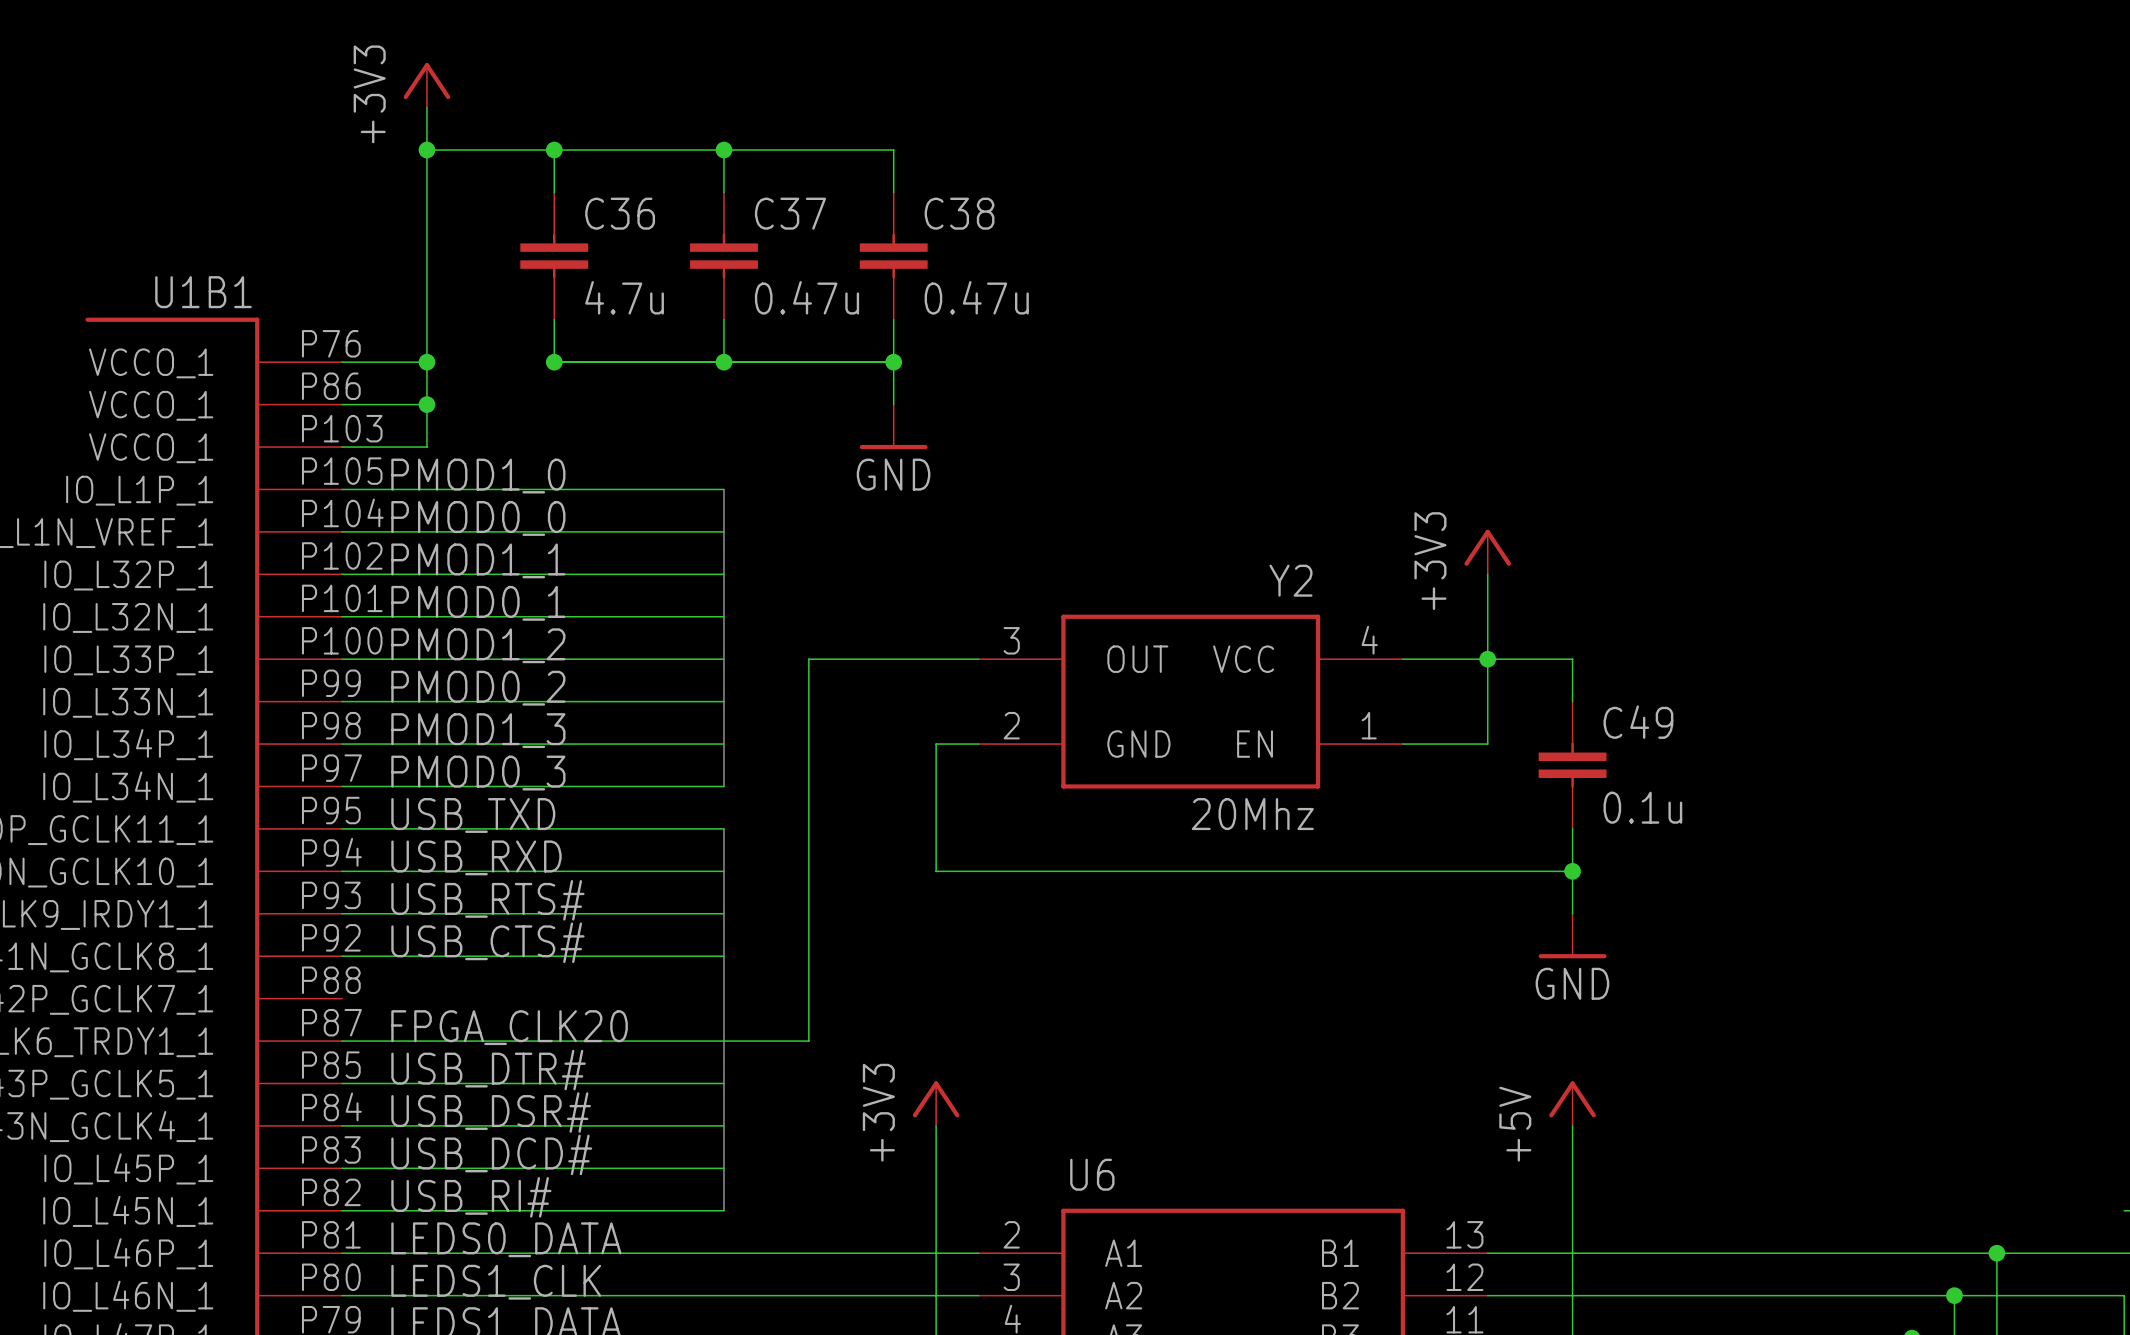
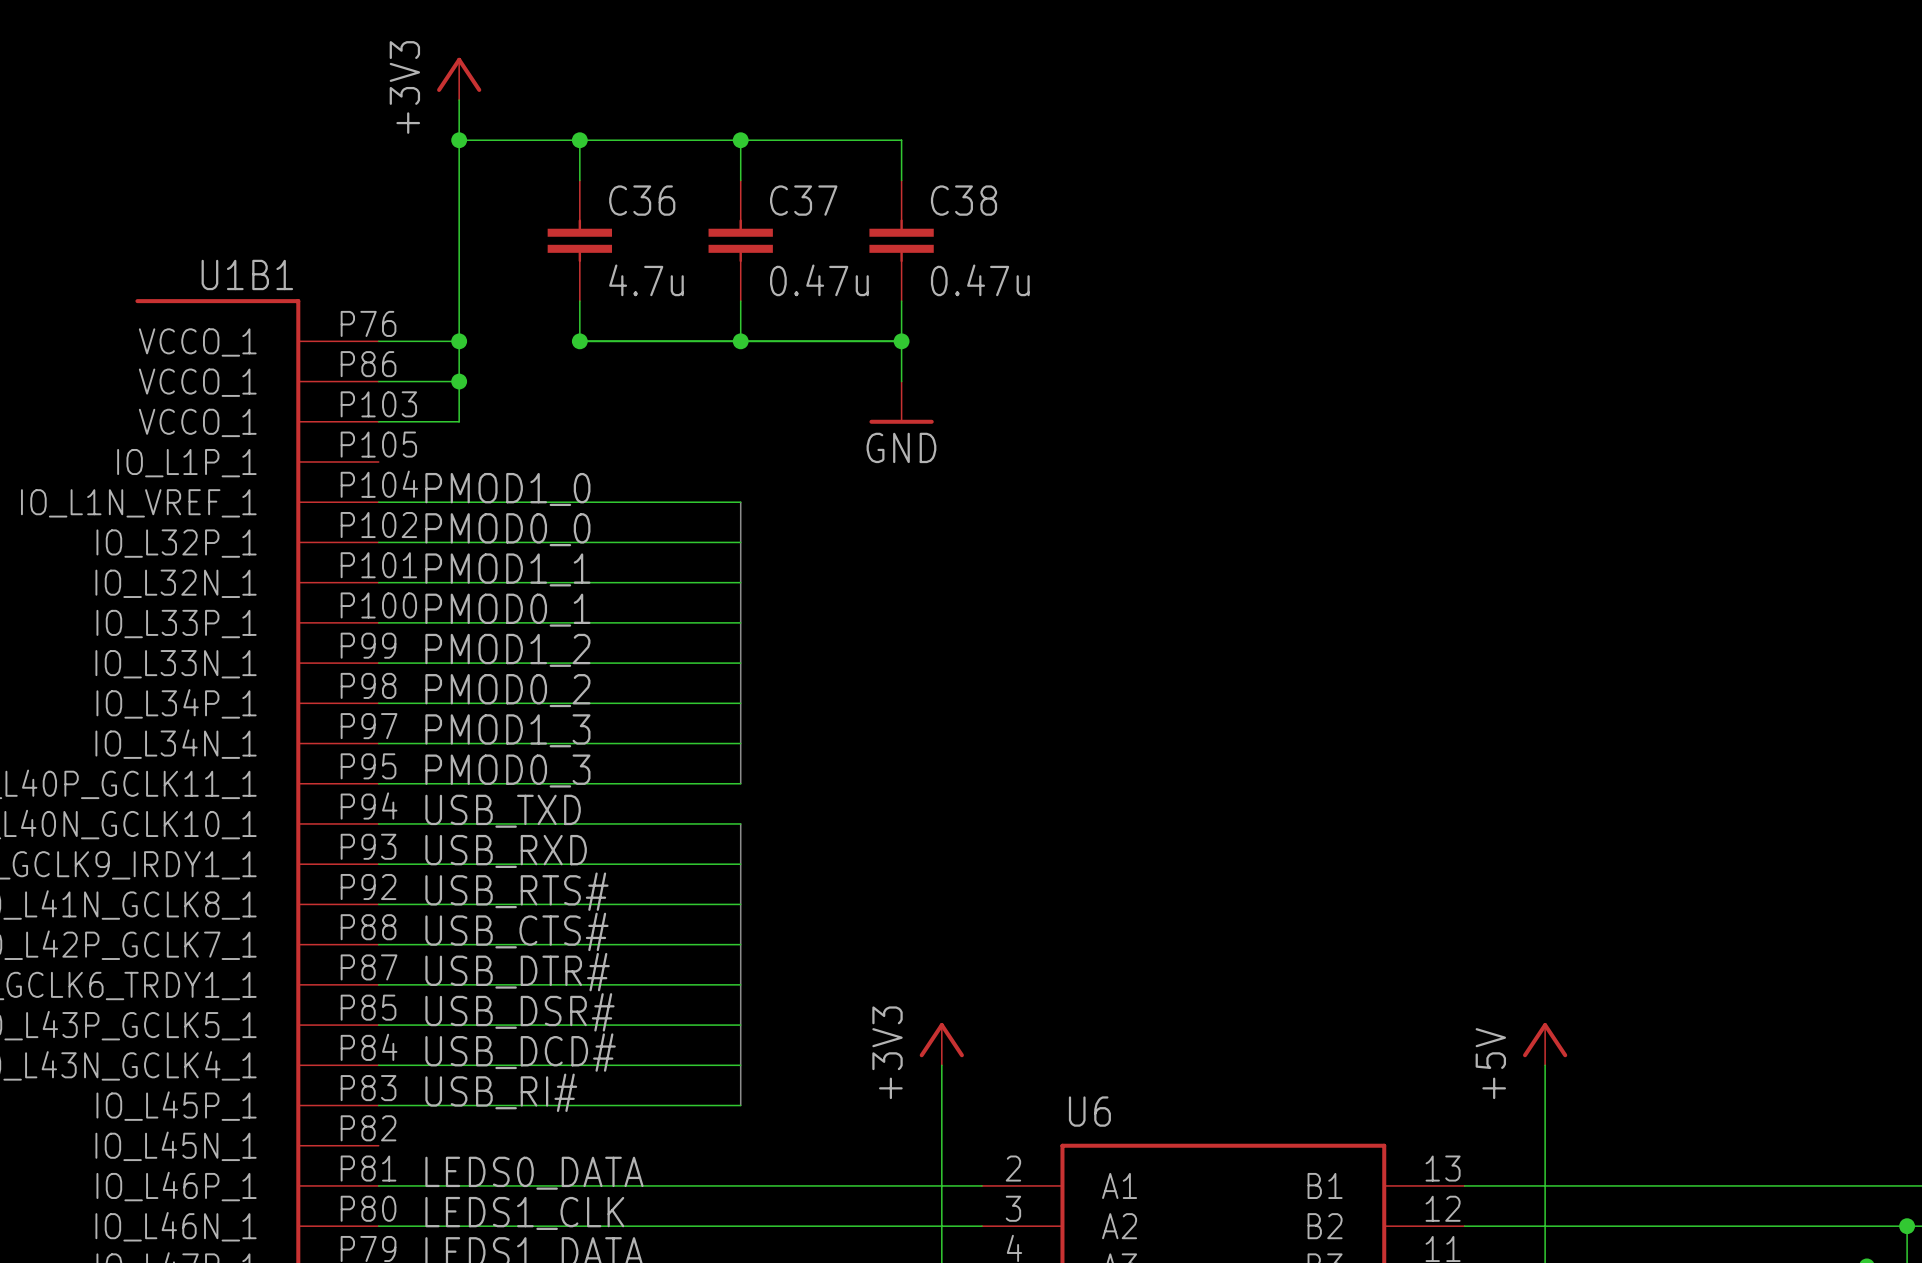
label: PMOD1_0 (478, 476) -> none
wire: (342, 489) (723, 489) -> none
bus: (723, 489) (723, 531) -> none
label: PMOD0_0 (478, 518) -> PMOD1_0 (507, 489)
power symbol: +3V3 (1487, 552) -> none
label: PMOD1_1 (478, 560) -> PMOD0_0 (507, 529)
wire: (1487, 574) (1487, 744) (1402, 744) -> none
label: PMOD0_1 (478, 603) -> PMOD1_1 (507, 569)
label: PMOD1_2 (478, 645) -> PMOD0_1 (507, 610)
wire: (978, 659) (808, 659) (808, 1041) (723, 1041) -> none
wire: (1402, 659) (1572, 659) (1572, 701) -> none
junction: (1487, 659) -> none
label: PMOD0_2 (478, 688) -> PMOD1_2 (507, 650)
Y2: 20Mhz (1190, 701) -> none
label: PMOD1_3 (478, 730) -> PMOD0_2 (507, 690)
wire: (978, 744) (936, 744) (936, 871) (1572, 871) -> none
C49: 0.1u (1572, 765) -> none
label: PMOD0_3 (478, 773) -> PMOD1_3 (507, 730)
label: USB_TXD (473, 815) -> PMOD0_3 (507, 771)
bus: (723, 828) (723, 871) -> (740, 783) (740, 743)
wire: (1572, 828) (1572, 913) -> none
label: USB_RXD (476, 857) -> USB_TXD (503, 811)
junction: (1572, 871) -> none
label: USB_RTS# (487, 900) -> USB_RXD (506, 851)
power symbol: GND (1572, 936) -> none
label: USB_CTS# (487, 942) -> USB_RTS# (516, 891)
label: none -> USB_CTS# (516, 931)
label: FPGA_CLK20 (509, 1027) -> USB_DTR# (517, 972)
label: USB_DTR# (488, 1070) -> USB_DSR# (519, 1012)
label: USB_DSR# (491, 1112) -> USB_DCD# (520, 1052)
label: USB_DCD# (491, 1154) -> USB_RI# (501, 1092)
bus: (723, 1168) (723, 1210) -> none
label: USB_RI# (471, 1197) -> none
wire: (342, 1210) (723, 1210) -> (378, 944) (740, 944)

